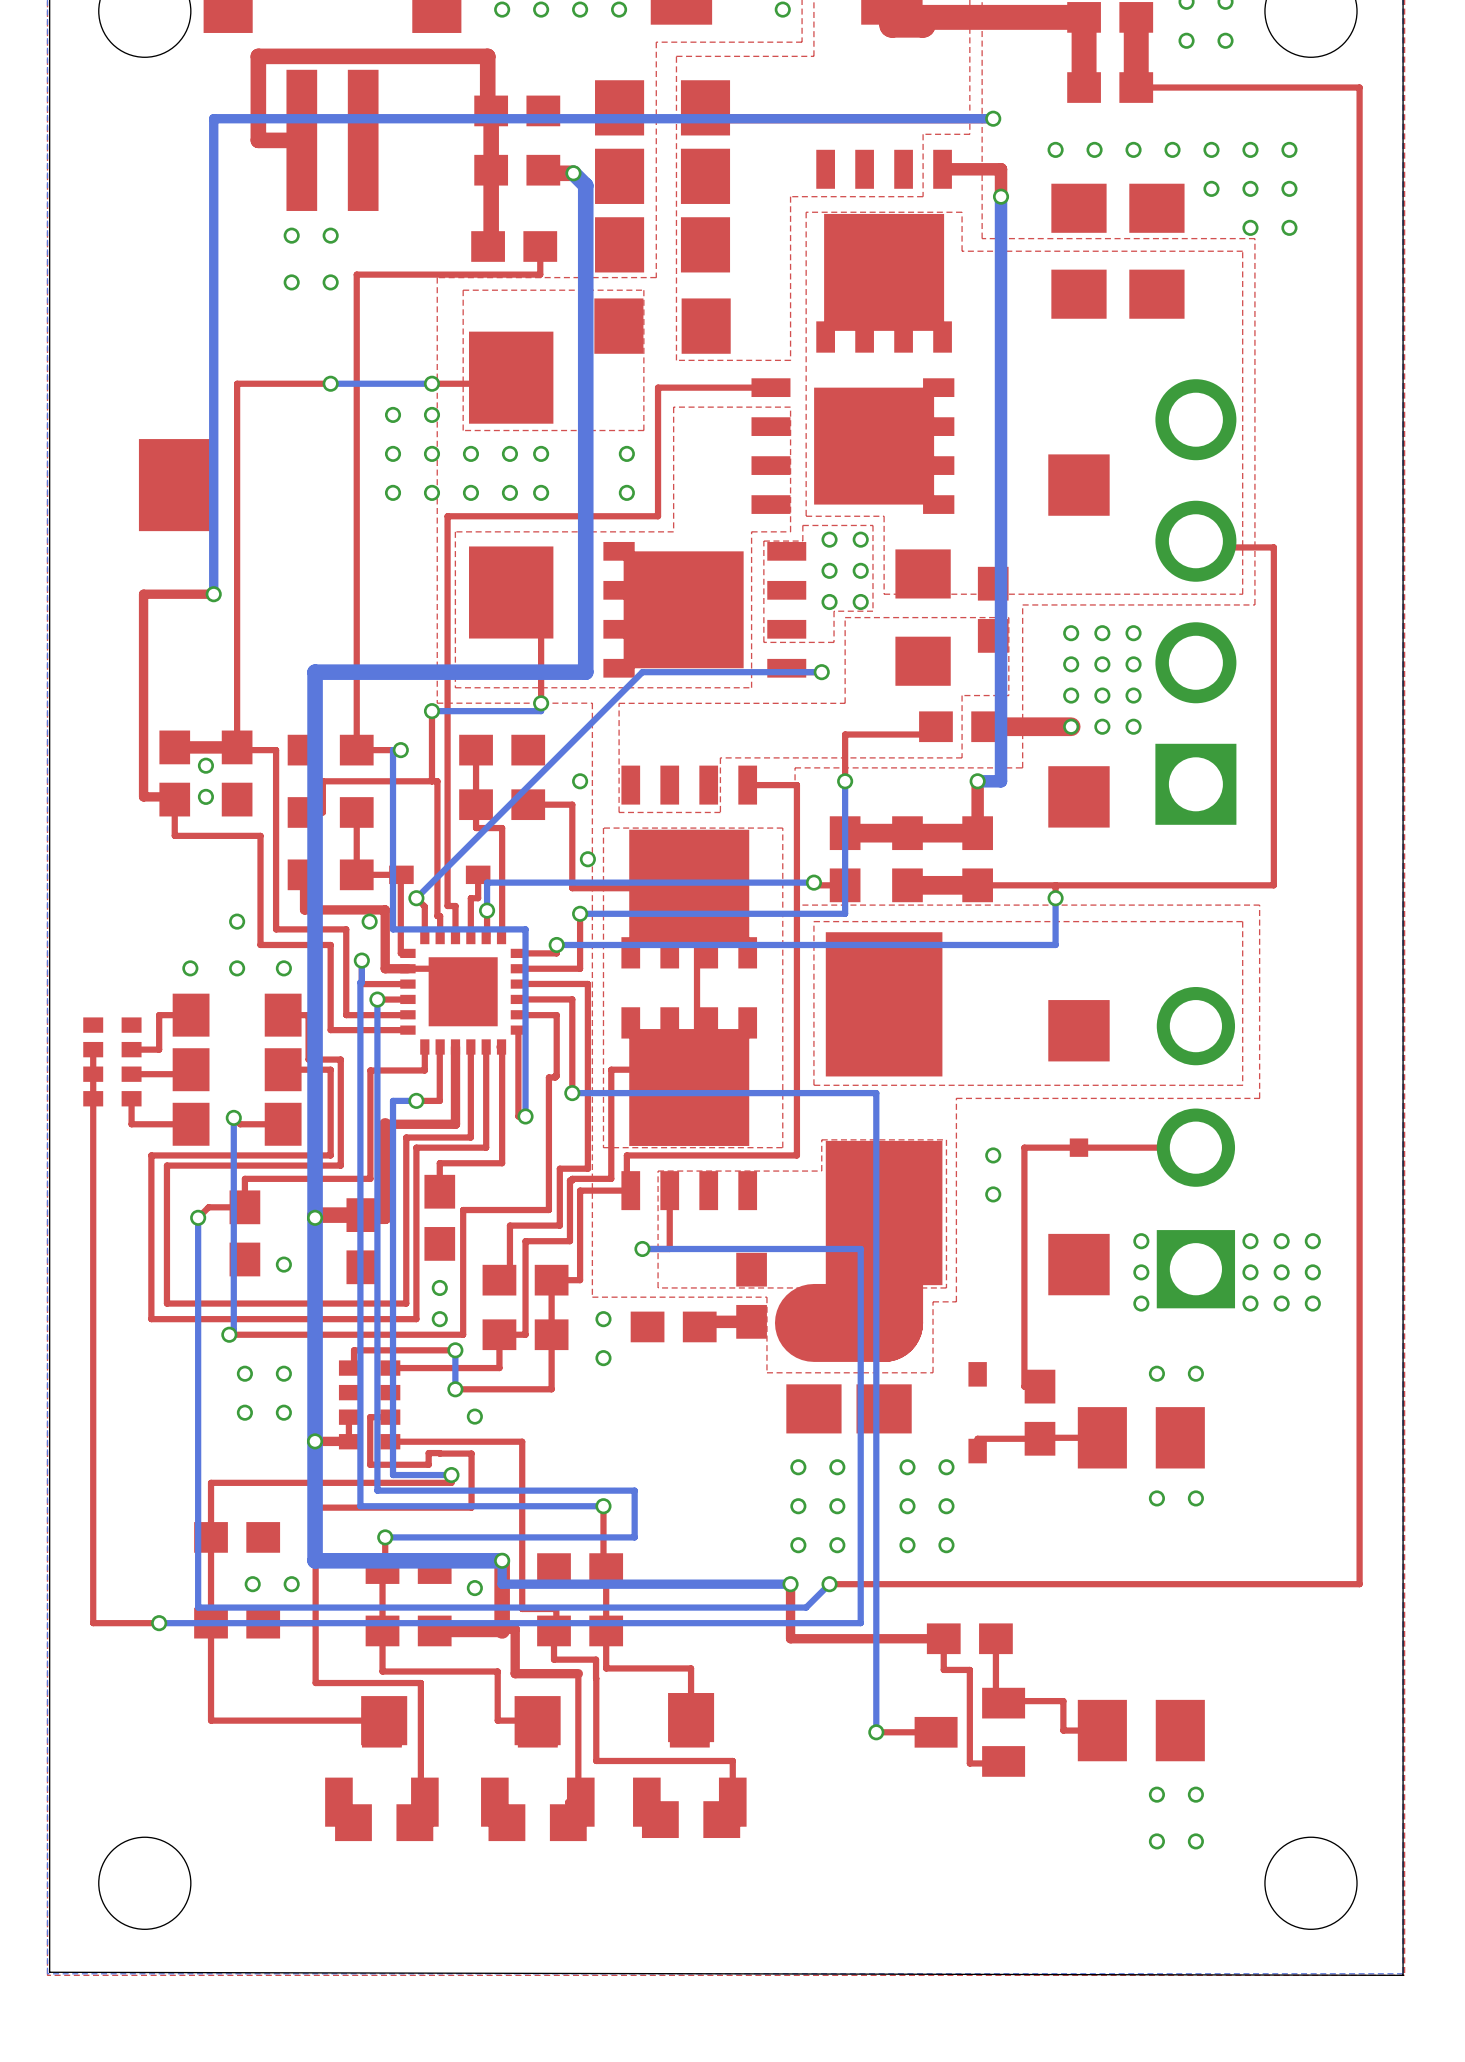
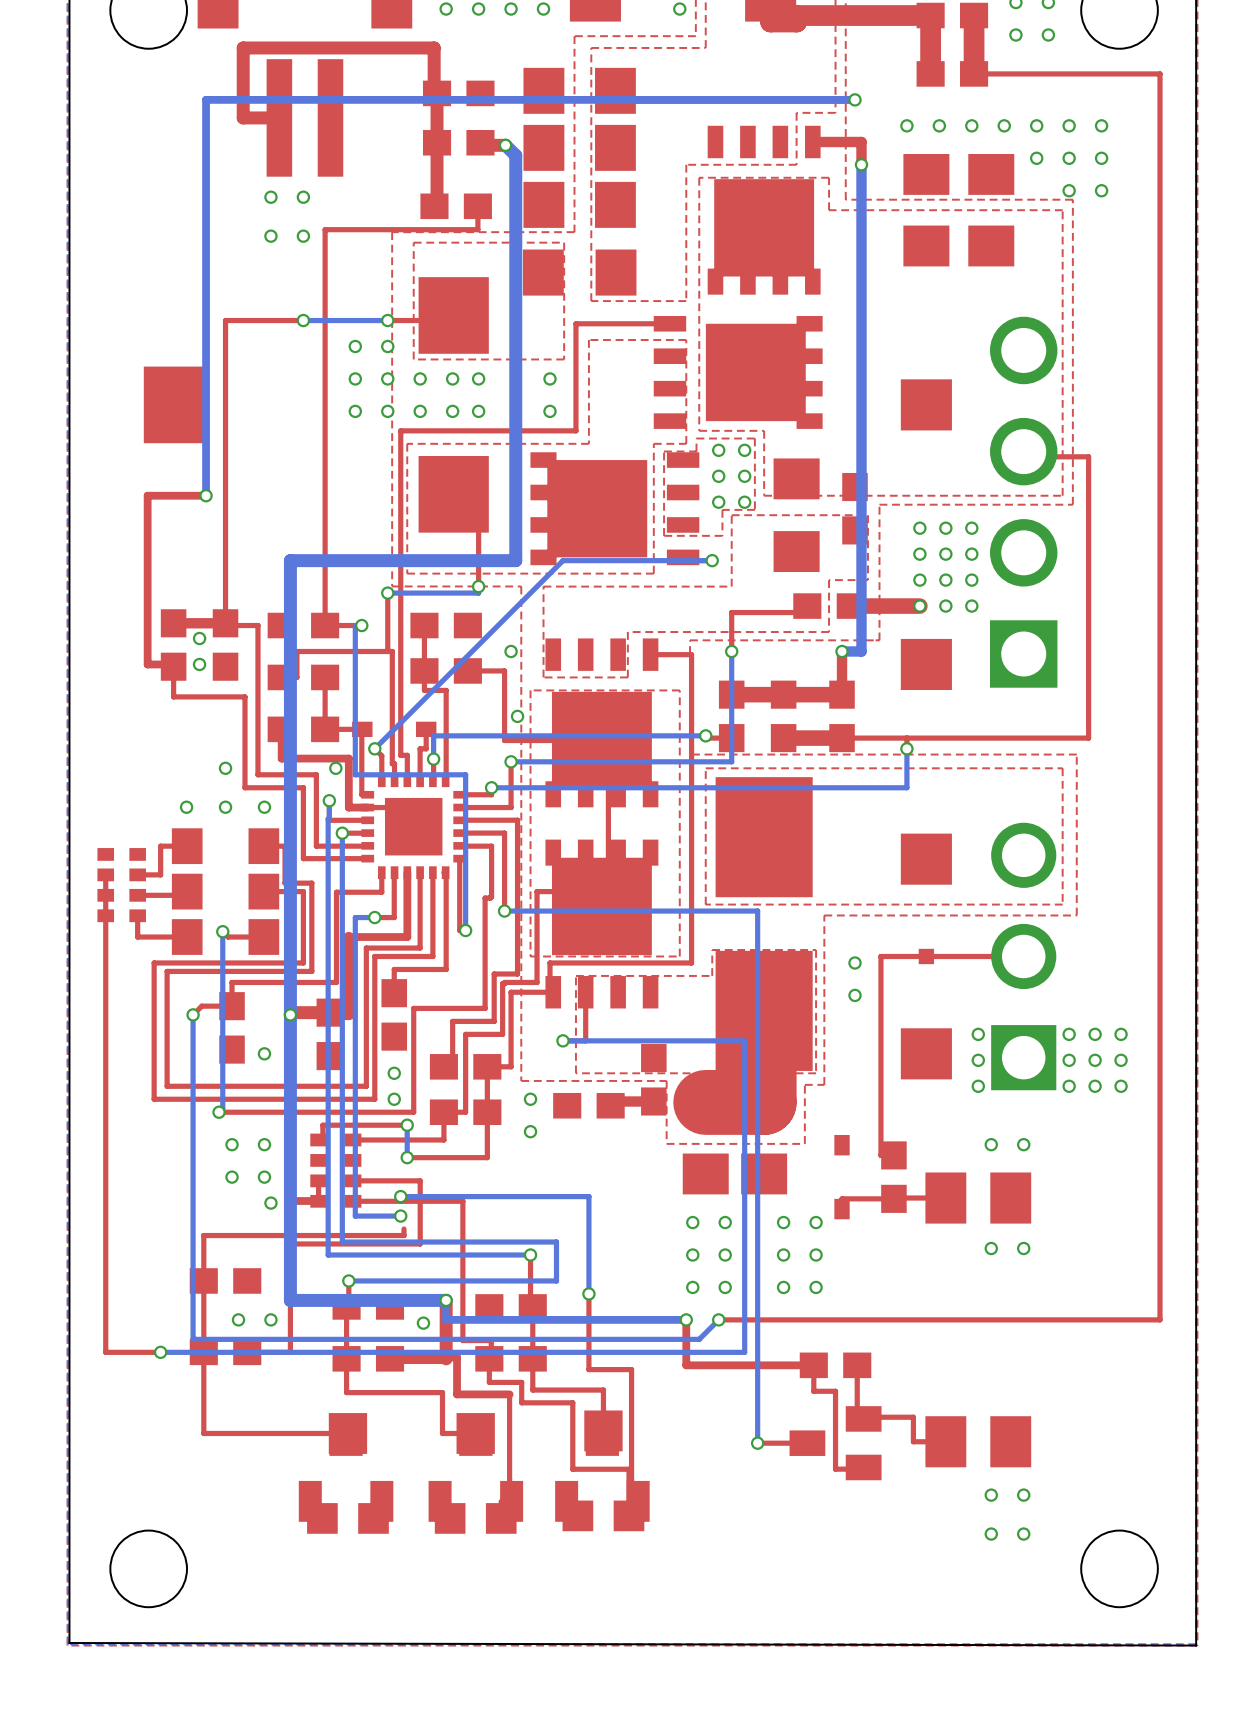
via: (474, 1416) -> none
top track: (390, 1417) (370, 1417) (370, 1464) (428, 1464) (428, 1453) (439, 1453) -> (353, 1180) (420, 1180) (420, 1243) (290, 1243) (290, 1352)
bottom track: none -> (400, 1196) (588, 1196) (588, 1293)
via: none -> (400, 1196)
via position: (315, 1441) -> (270, 1203)
top track: (439, 1453) (471, 1453) (471, 1507) (315, 1507) (315, 1683) (420, 1683) (420, 1822) -> none
bottom track: (393, 1459) (393, 1475) (451, 1475) -> (355, 1216) (400, 1216)
via position: (451, 1475) -> (400, 1216)
via: none -> (588, 1293)
top track: (554, 1659) (596, 1659) (596, 1678) -> (489, 1382) (521, 1382) (521, 1402) (572, 1402) (572, 1469) (628, 1469) (628, 1515)
top track: (596, 1678) (596, 1760) (732, 1760) (732, 1819) (724, 1819) -> (588, 1293) (588, 1369) (631, 1369) (631, 1515)

